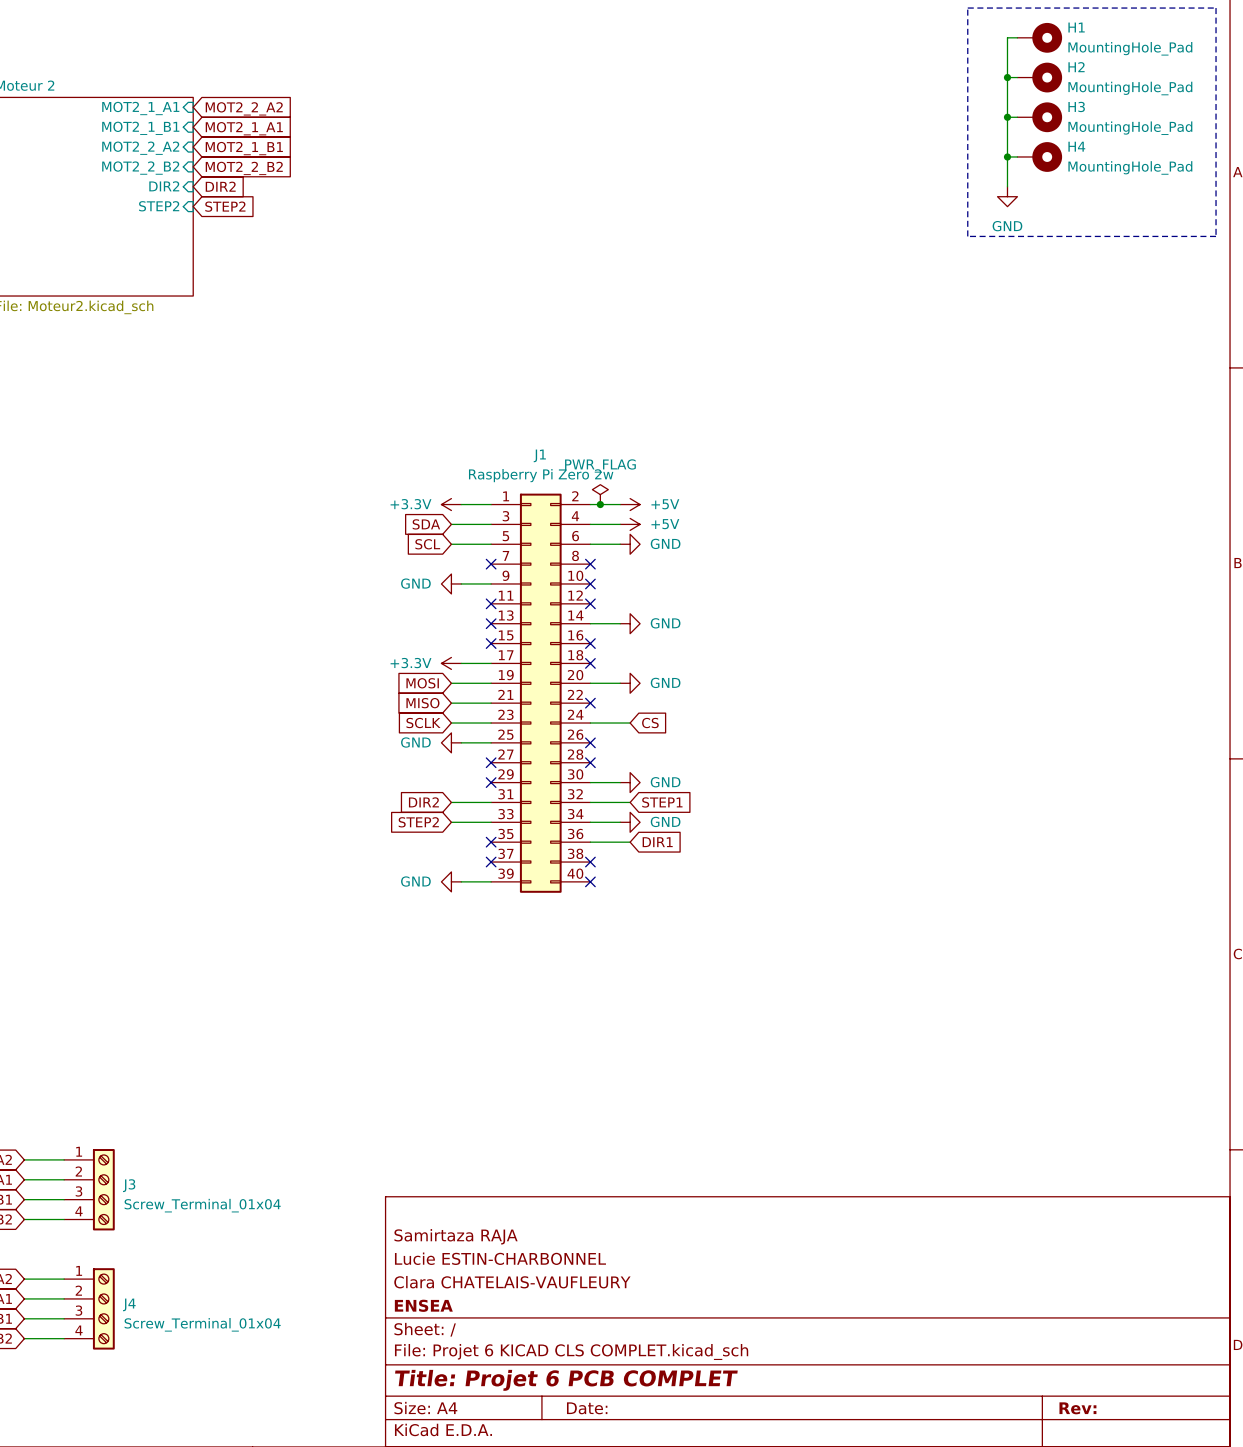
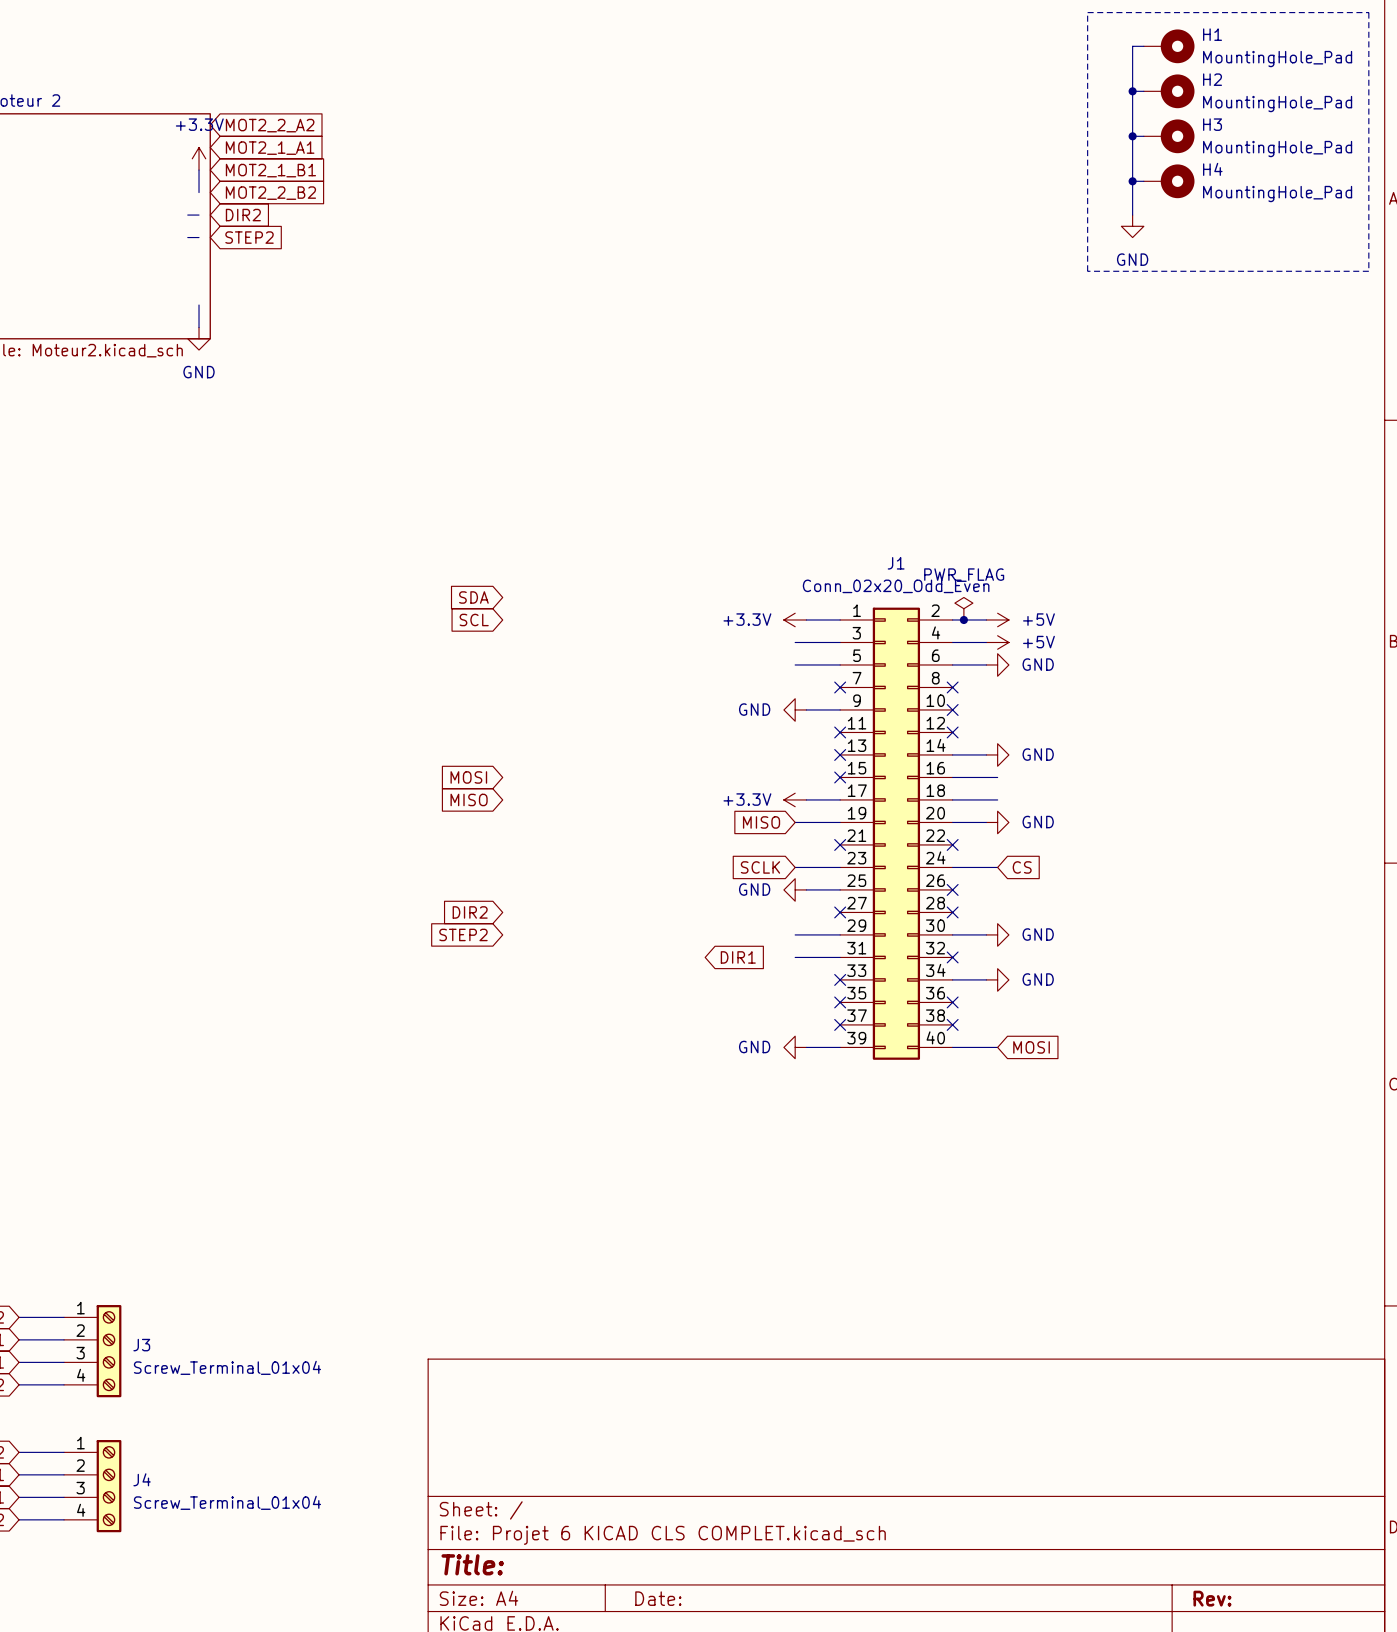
sheet pin: MOT2_1_A1 (140, 108) -> none
sheet pin: MOT2_1_B1 (140, 128) -> none
power symbol: none -> +3.3V (199, 158)
wire: none -> (199, 170) (199, 192)
sheet pin: MOT2_2_A2 (140, 148) -> none
sheet pin: MOT2_2_B2 (140, 168) -> none
sheet pin: DIR2 (164, 186) -> none
wire: none -> (187, 215) (199, 215)
sheet pin: STEP2 (159, 206) -> none
wire: none -> (187, 237) (199, 237)
wire: none -> (199, 305) (199, 327)
power symbol: none -> GND (199, 338)
J1 value: Raspberry Pi Zero 2w (541, 475) -> Conn_02x20_Odd_Even (896, 586)
power symbol: PWR_FLAG (600, 494) -> none
power symbol: +3.3V (451, 504) -> none
wire: (461, 504) (491, 504) -> none
wire: (590, 504) (620, 504) -> none
junction: (600, 504) -> none
power symbol: +5V (630, 504) -> none
wire: (451, 524) (491, 524) -> none
wire: (590, 524) (620, 524) -> none
power symbol: +5V (630, 524) -> none
power symbol: none -> PWR_FLAG (963, 608)
wire: (451, 544) (491, 544) -> none
wire: (590, 544) (620, 544) -> (806, 619) (840, 619)
power symbol: GND (630, 544) -> none
power symbol: none -> +3.3V (795, 619)
wire: none -> (952, 619) (986, 619)
junction: none -> (963, 619)
power symbol: none -> +5V (997, 619)
no-connect mark: (491, 564) -> none
no-connect mark: (590, 564) -> none
wire: none -> (795, 642) (840, 642)
wire: none -> (952, 642) (986, 642)
power symbol: none -> +5V (997, 642)
power symbol: GND (451, 583) -> none
wire: (461, 583) (491, 583) -> none
no-connect mark: (590, 583) -> none
wire: none -> (795, 664) (840, 664)
wire: none -> (952, 664) (986, 664)
power symbol: none -> GND (997, 664)
no-connect mark: (491, 603) -> none
no-connect mark: (590, 603) -> none
no-connect mark: none -> (840, 687)
no-connect mark: none -> (952, 687)
no-connect mark: (491, 623) -> none
wire: (590, 623) (620, 623) -> (806, 709) (840, 709)
power symbol: GND (630, 623) -> none
power symbol: none -> GND (795, 709)
no-connect mark: none -> (952, 709)
no-connect mark: (491, 643) -> none
no-connect mark: (590, 643) -> none
no-connect mark: none -> (840, 732)
no-connect mark: none -> (952, 732)
power symbol: +3.3V (451, 663) -> none
wire: (461, 663) (491, 663) -> none
no-connect mark: (590, 663) -> none
no-connect mark: none -> (840, 754)
wire: none -> (952, 754) (986, 754)
power symbol: none -> GND (997, 754)
wire: (451, 683) (491, 683) -> none
wire: (590, 683) (620, 683) -> (806, 799) (840, 799)
power symbol: GND (630, 683) -> none
no-connect mark: none -> (840, 777)
wire: none -> (952, 777) (997, 777)
J1 position: (540, 693) -> (896, 833)
wire: (451, 703) (491, 703) -> none
no-connect mark: (590, 703) -> none
power symbol: none -> +3.3V (795, 799)
wire: none -> (952, 799) (997, 799)
global label: SCLK (423, 723) -> none
wire: (451, 723) (491, 723) -> none
wire: (590, 723) (630, 723) -> (795, 822) (840, 822)
global label: CS (650, 723) -> none
global label: none -> MISO (761, 822)
wire: none -> (952, 822) (986, 822)
power symbol: none -> GND (997, 822)
power symbol: GND (451, 742) -> none
wire: (461, 742) (491, 742) -> none
no-connect mark: (590, 742) -> none
no-connect mark: none -> (840, 844)
no-connect mark: none -> (952, 844)
no-connect mark: (491, 762) -> none
no-connect mark: (590, 762) -> none
global label: none -> SCLK (760, 867)
wire: none -> (795, 867) (840, 867)
wire: none -> (952, 867) (997, 867)
global label: none -> CS (1022, 867)
no-connect mark: (491, 782) -> none
wire: (590, 782) (620, 782) -> (806, 889) (840, 889)
power symbol: GND (630, 782) -> none
power symbol: none -> GND (795, 889)
no-connect mark: none -> (952, 889)
wire: (451, 802) (491, 802) -> none
wire: (590, 802) (630, 802) -> (795, 934) (840, 934)
global label: STEP1 (662, 802) -> none
no-connect mark: none -> (840, 912)
no-connect mark: none -> (952, 912)
wire: (451, 822) (491, 822) -> none
wire: (590, 822) (620, 822) -> (806, 1047) (840, 1047)
power symbol: GND (630, 822) -> none
wire: none -> (952, 934) (986, 934)
power symbol: none -> GND (997, 934)
no-connect mark: (491, 842) -> none
wire: (590, 842) (630, 842) -> (795, 957) (840, 957)
no-connect mark: none -> (952, 957)
no-connect mark: (491, 862) -> none
no-connect mark: (590, 862) -> none
no-connect mark: none -> (840, 979)
wire: none -> (952, 979) (986, 979)
power symbol: none -> GND (997, 979)
power symbol: GND (451, 881) -> none
wire: (461, 881) (491, 881) -> none
no-connect mark: (590, 881) -> none
no-connect mark: none -> (840, 1002)
no-connect mark: none -> (952, 1002)
no-connect mark: none -> (840, 1024)
no-connect mark: none -> (952, 1024)
power symbol: none -> GND (795, 1047)
wire: none -> (952, 1047) (997, 1047)
global label: none -> MOSI (1031, 1047)
title block: Samirtaza RAJA (456, 1236) -> none
title block: Lucie ESTIN-CHARBONNEL (500, 1258) -> none
title block: Clara CHATELAIS-VAUFLEURY (512, 1282) -> none
title block: ENSEA (423, 1305) -> none
title block: Title: Projet 6 PCB COMPLET (566, 1380) -> Title: (472, 1564)

